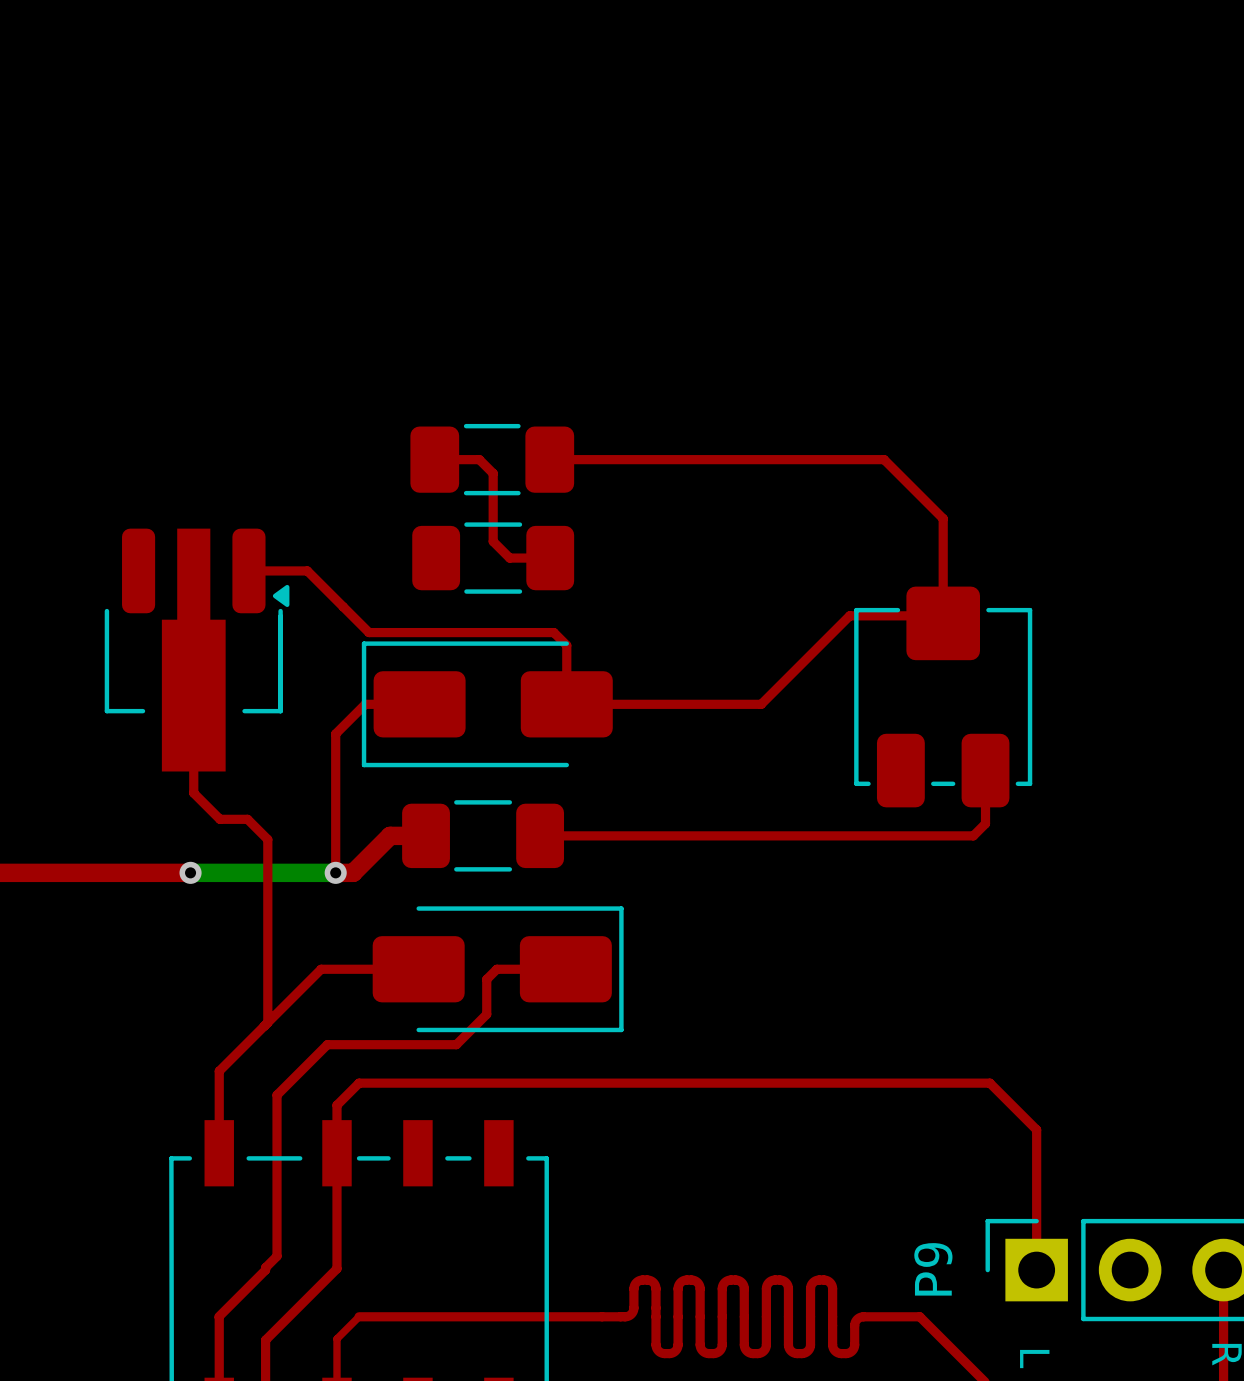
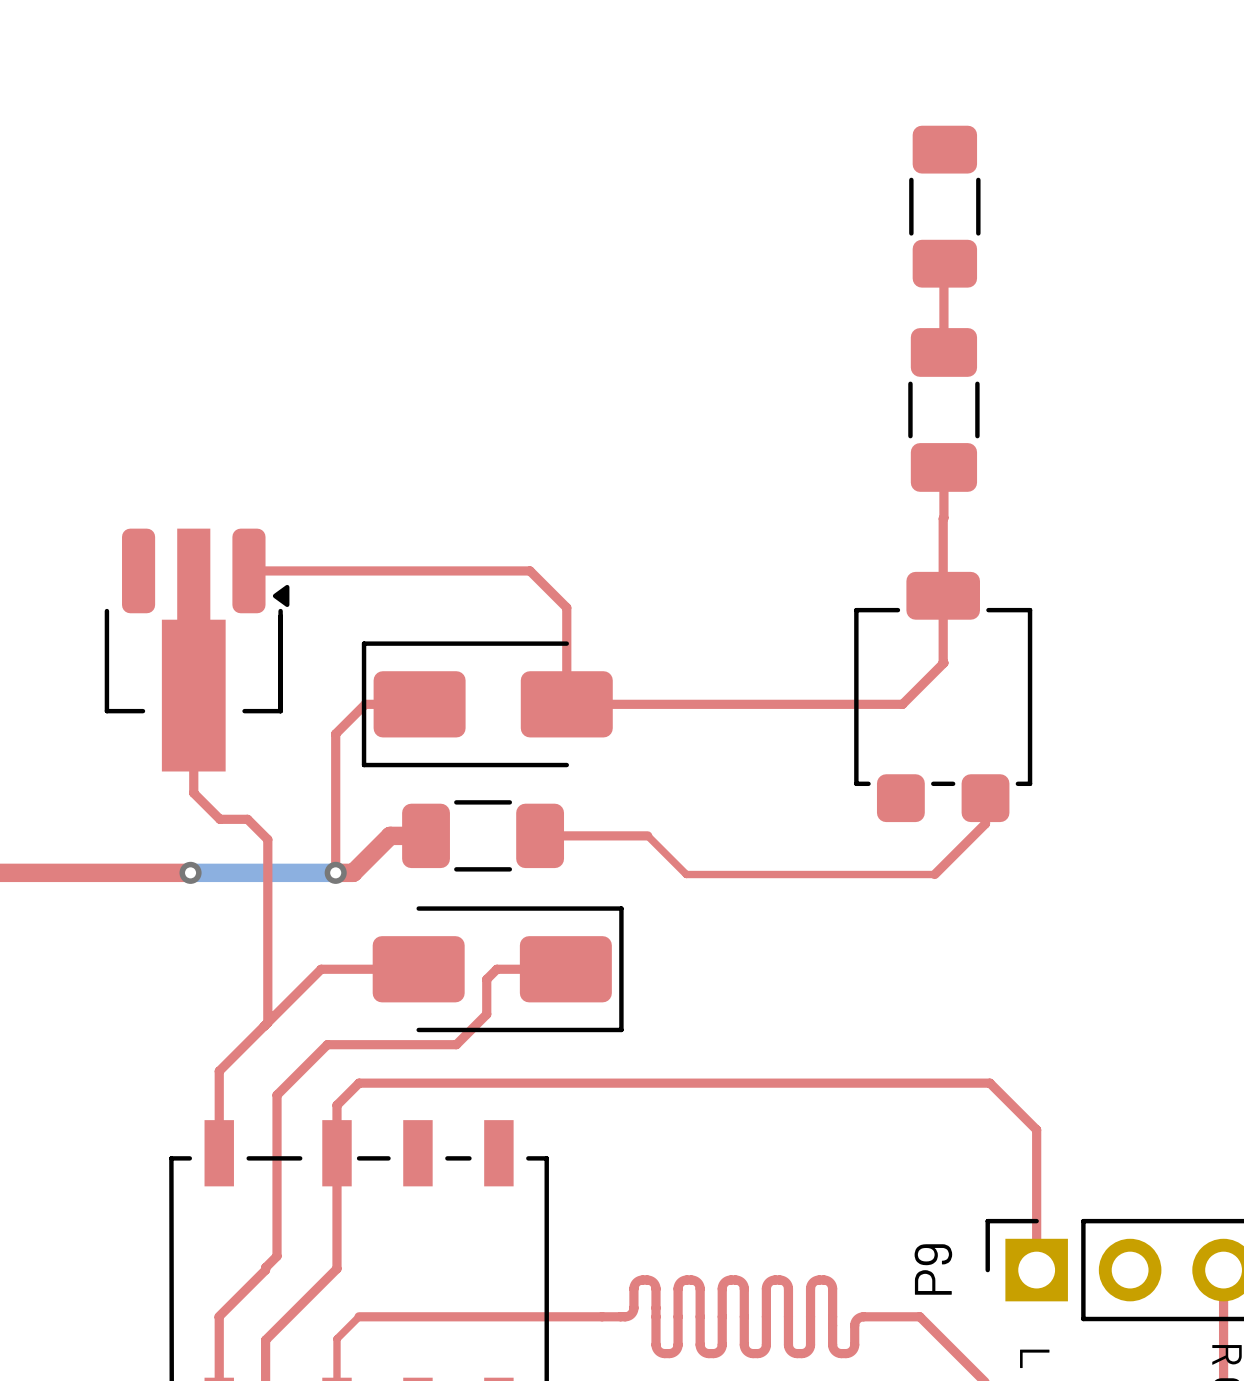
top track: none -> (944, 263) (943, 352)
top track: (434, 459) (479, 459) (493, 473) (493, 541) (509, 558) (550, 558) -> none
part rotation: 0° (492, 459) -> 90° clockwise (943, 409)
part position: (492, 459) -> (943, 409)
top track: (549, 459) (884, 459) (943, 518) -> (943, 467) (943, 518)
part rotation: 0° (493, 558) -> 90° clockwise (944, 206)
part position: (493, 558) -> (944, 206)
top track: (307, 570) (369, 632) (553, 632) (566, 645) -> (307, 570) (529, 570) (566, 607) (566, 645)
part footprint: [854, 586, 1033, 808] -> [854, 571, 1033, 823]
top track: (943, 615) (849, 615) (761, 704) -> (943, 615) (943, 662) (902, 704) (761, 704)
top track: (647, 835) (973, 835) -> (647, 835) (686, 874) (934, 874) (973, 835)

